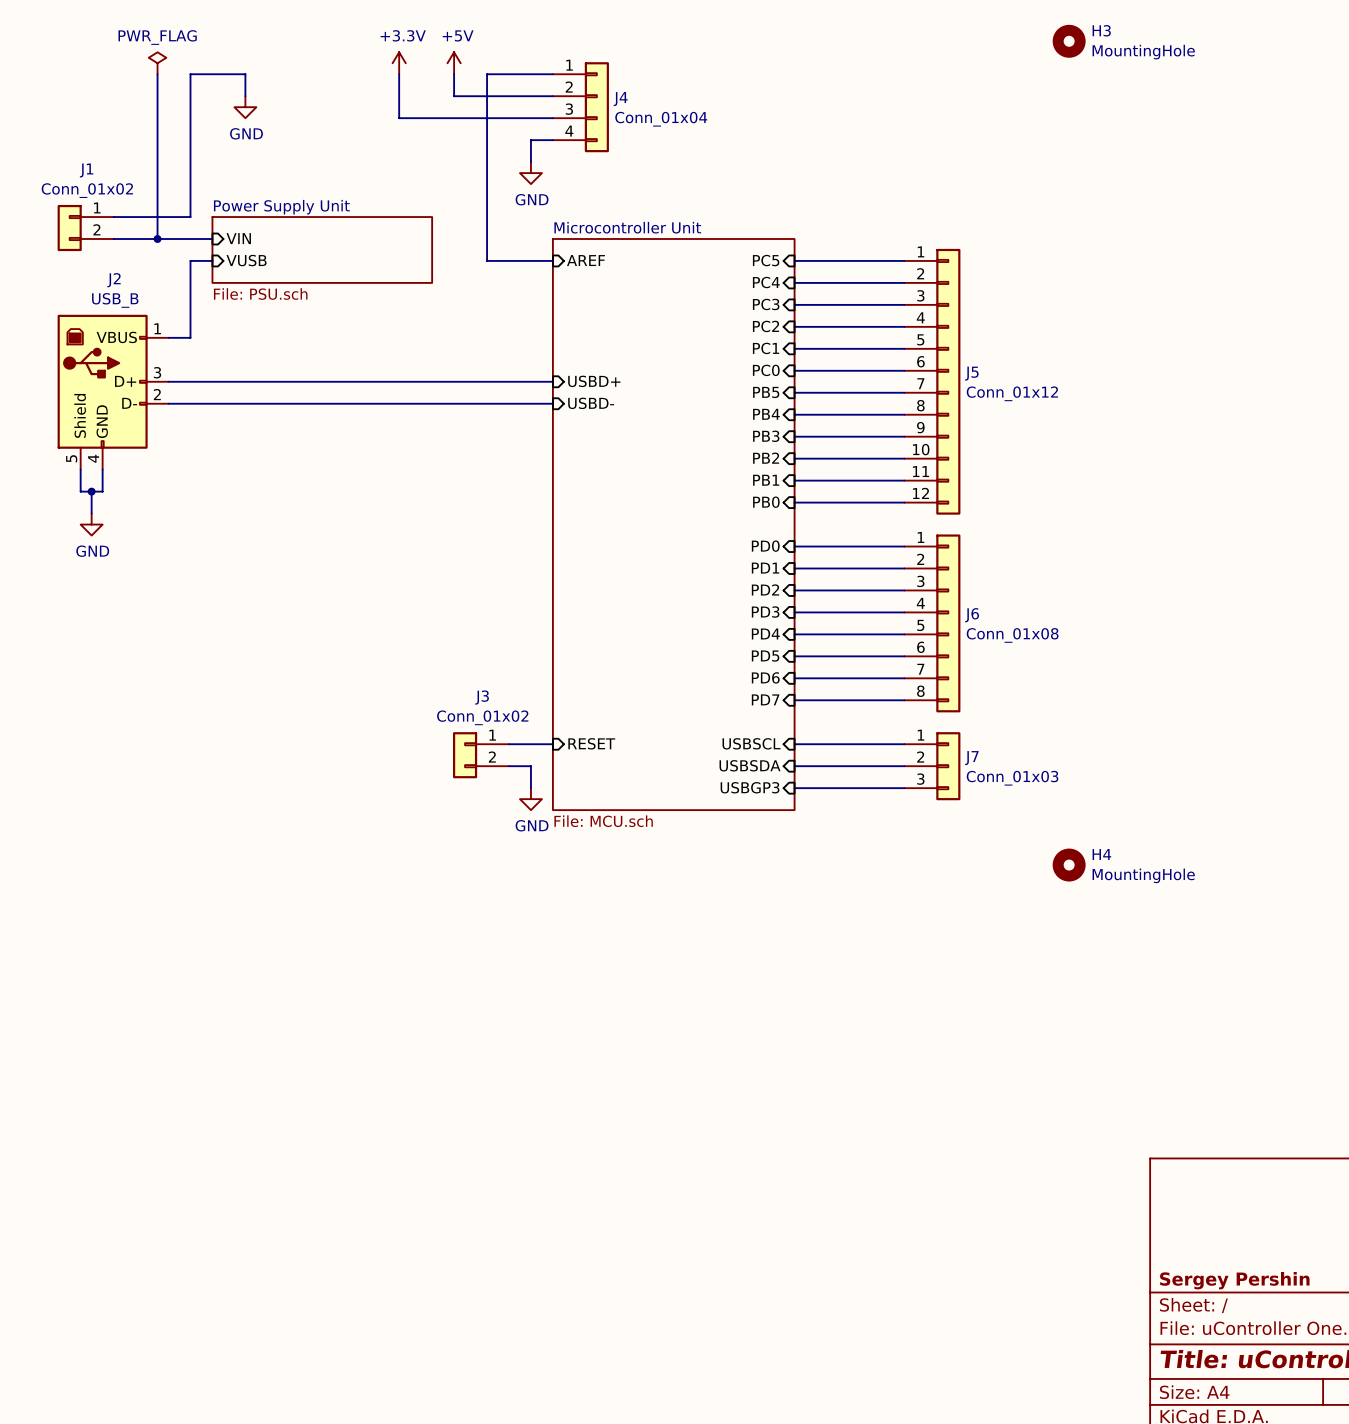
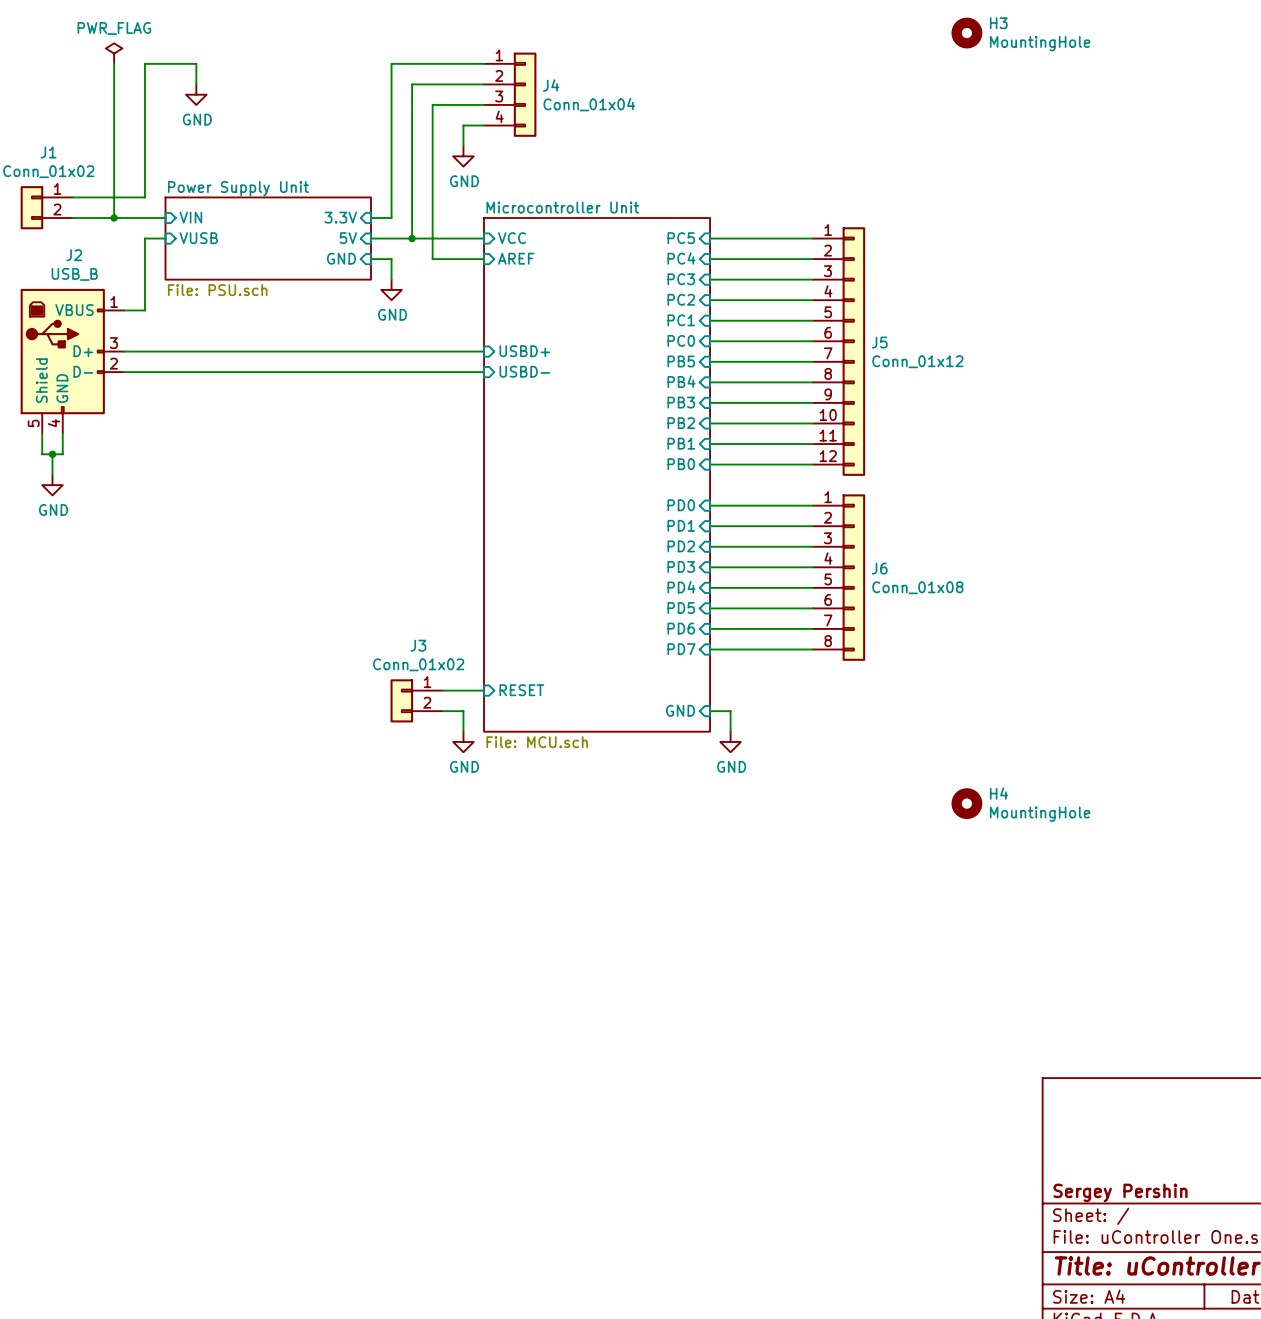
power symbol: +3.3V (399, 63) -> none
power symbol: +5V (454, 63) -> none
wire: (399, 74) (399, 118) (498, 118) -> (484, 259) (432, 259) (432, 104)
wire: (487, 74) (487, 260) -> (422, 63) (391, 63)
wire: (454, 96) (476, 96) -> (391, 84) (391, 217) (370, 217)
wire: none -> (412, 84) (412, 238)
sheet pin: none -> 3.3V (340, 217)
sheet Power Supply Unit: File: PSU.sch (322, 249) -> none
sheet Power Supply Unit: none -> File: PSU.sch (268, 238)
sheet pin: none -> 5V (348, 238)
wire: none -> (370, 238) (422, 238)
junction: none -> (412, 238)
sheet pin: AREF (585, 260) -> VCC (512, 238)
sheet pin: none -> GND (341, 258)
wire: none -> (370, 259) (391, 259) (391, 279)
sheet pin: none -> AREF (516, 258)
power symbol: none -> GND (391, 289)
sheet Microcontroller Unit: none -> File: MCU.sch (597, 474)
sheet Microcontroller Unit: File: MCU.sch (673, 524) -> none
sheet pin: USBSCL (751, 743) -> none
wire: (794, 744) (904, 744) -> none
sheet pin: USBSDA (750, 765) -> GND (680, 710)
wire: (816, 766) (904, 766) -> (730, 711) (730, 731)
J7: Conn_01x03 (932, 766) -> none
sheet pin: USBGP3 (750, 787) -> none
wire: (794, 788) (904, 788) -> none
power symbol: none -> GND (730, 741)

